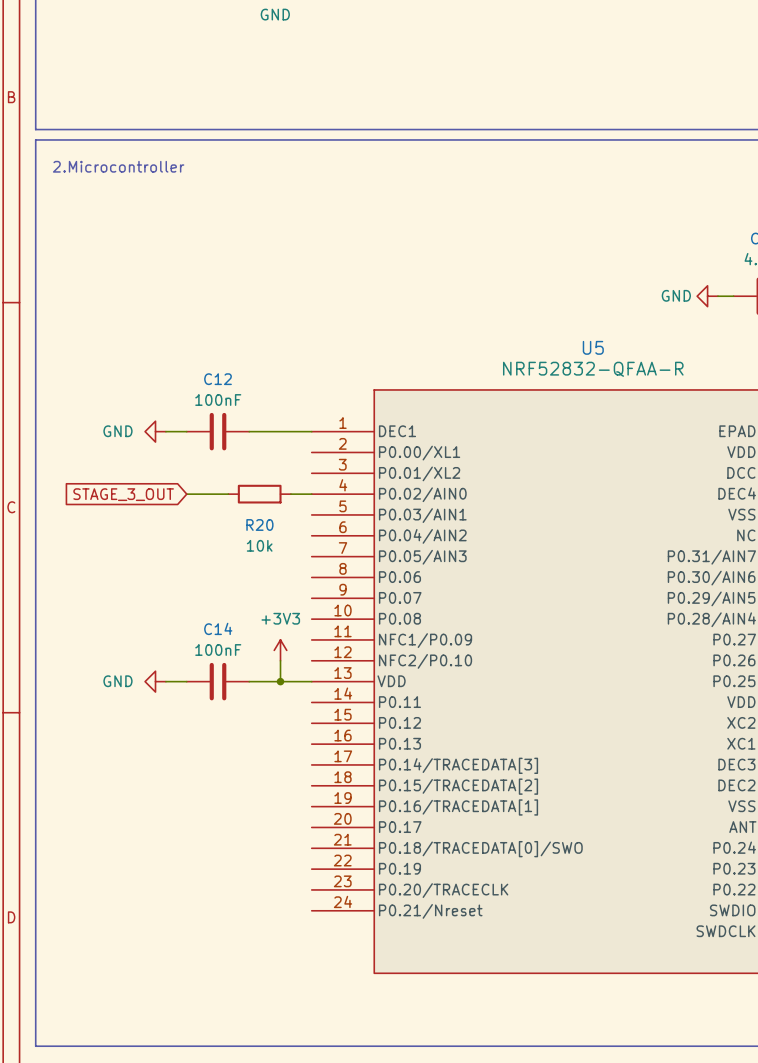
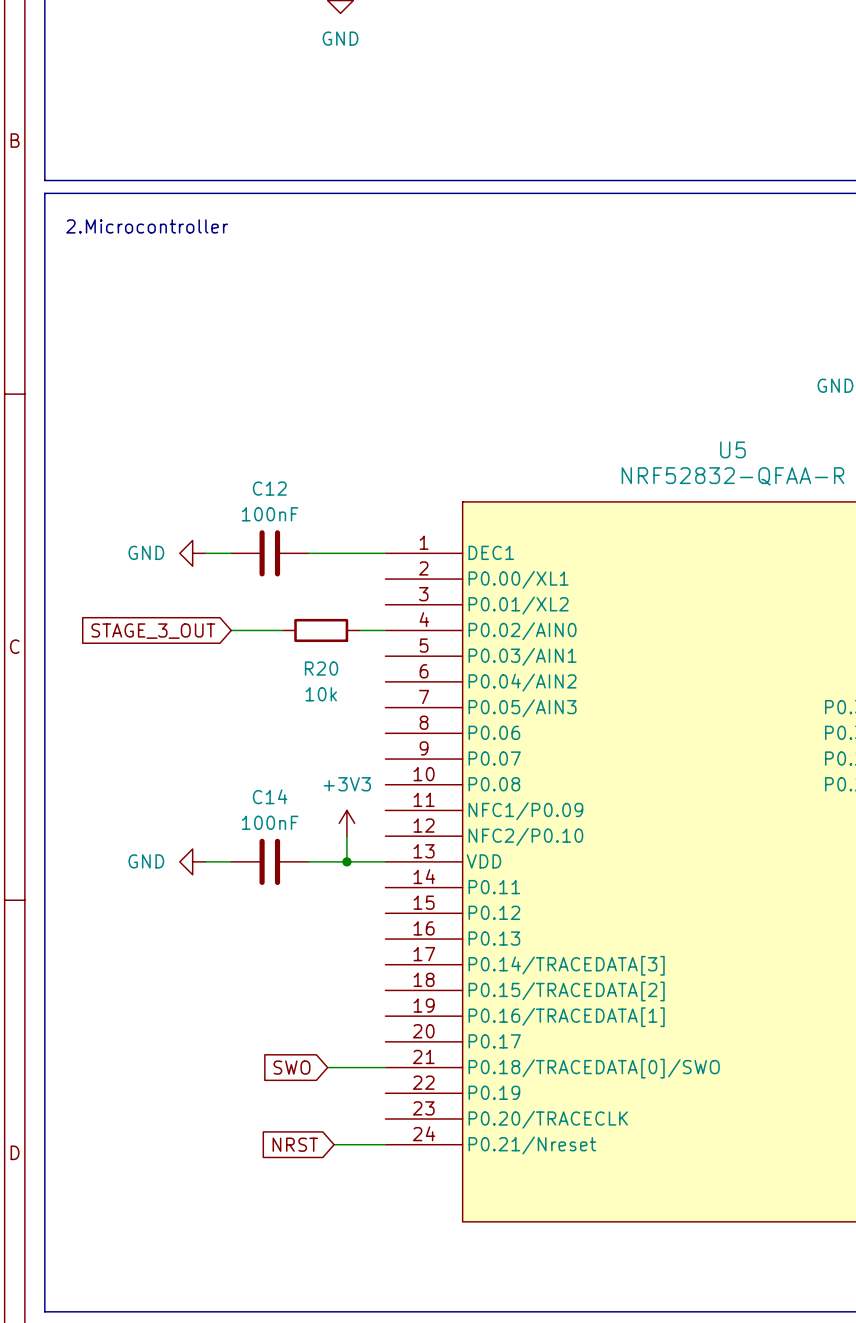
global label: none -> SWO (291, 1067)
wire: none -> (327, 1067) (385, 1067)
global label: none -> NRST (295, 1144)
wire: none -> (334, 1144) (385, 1144)

